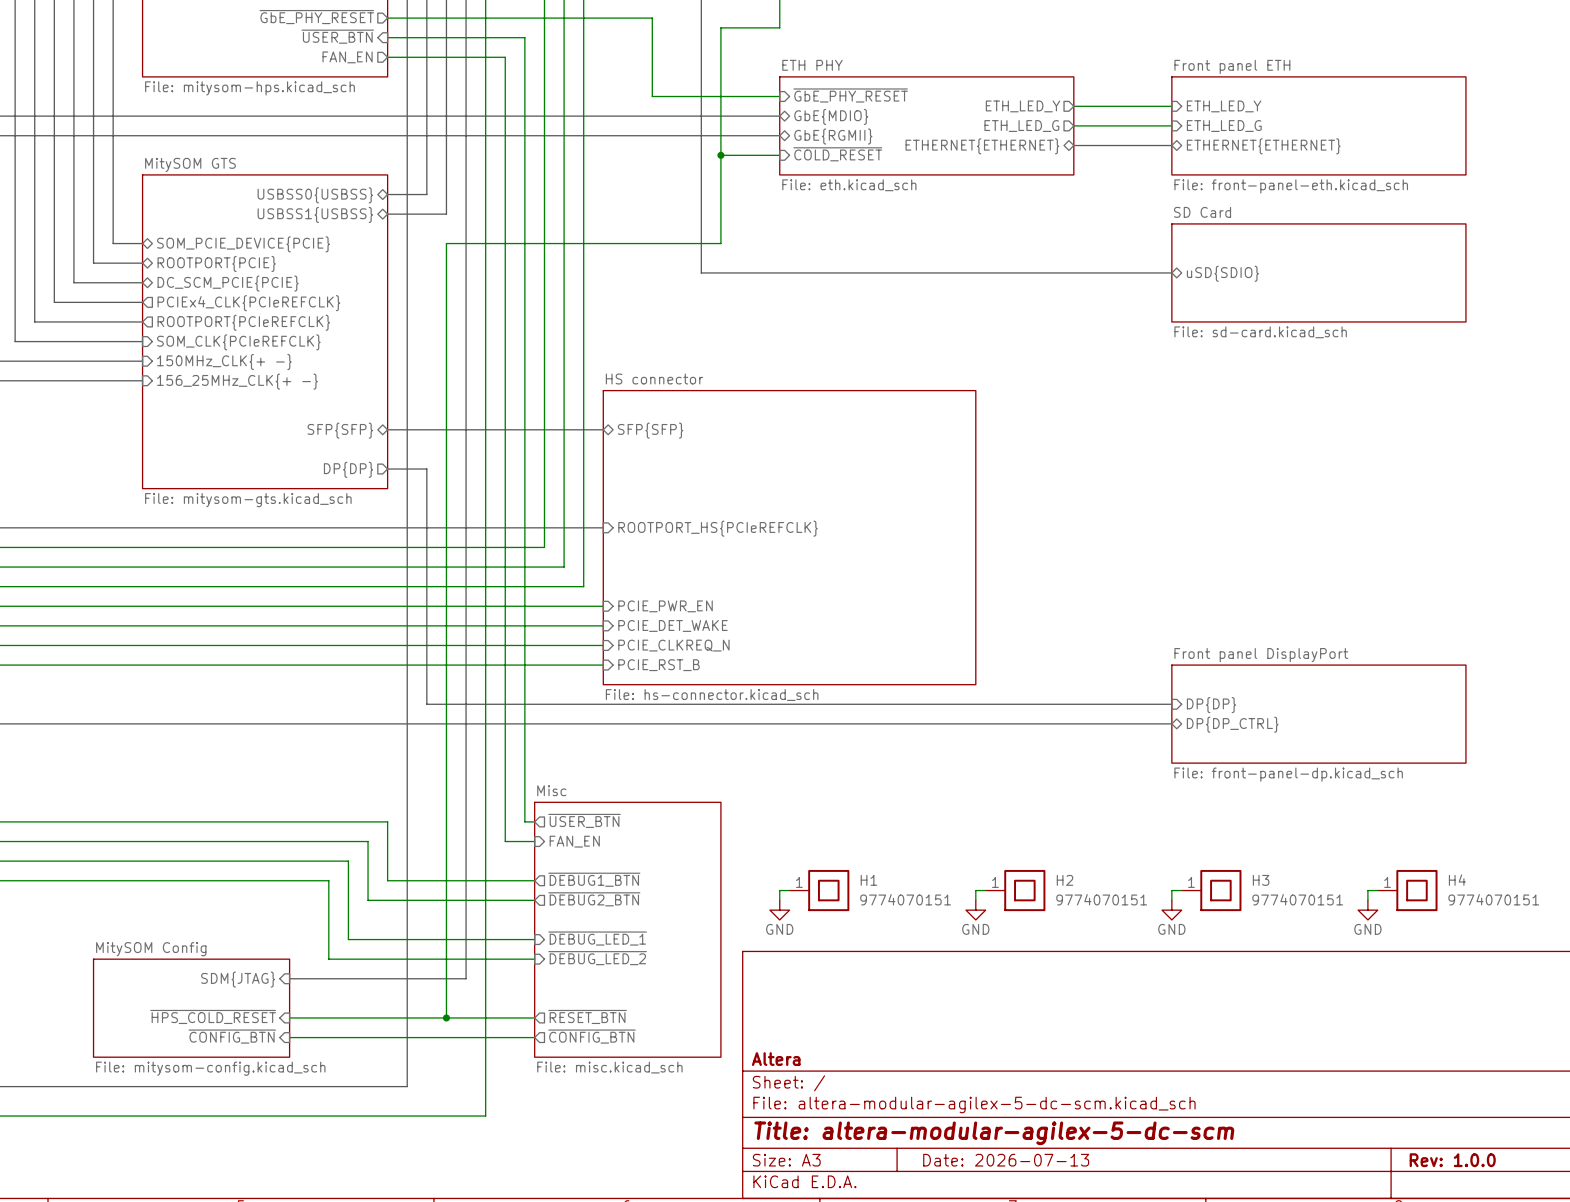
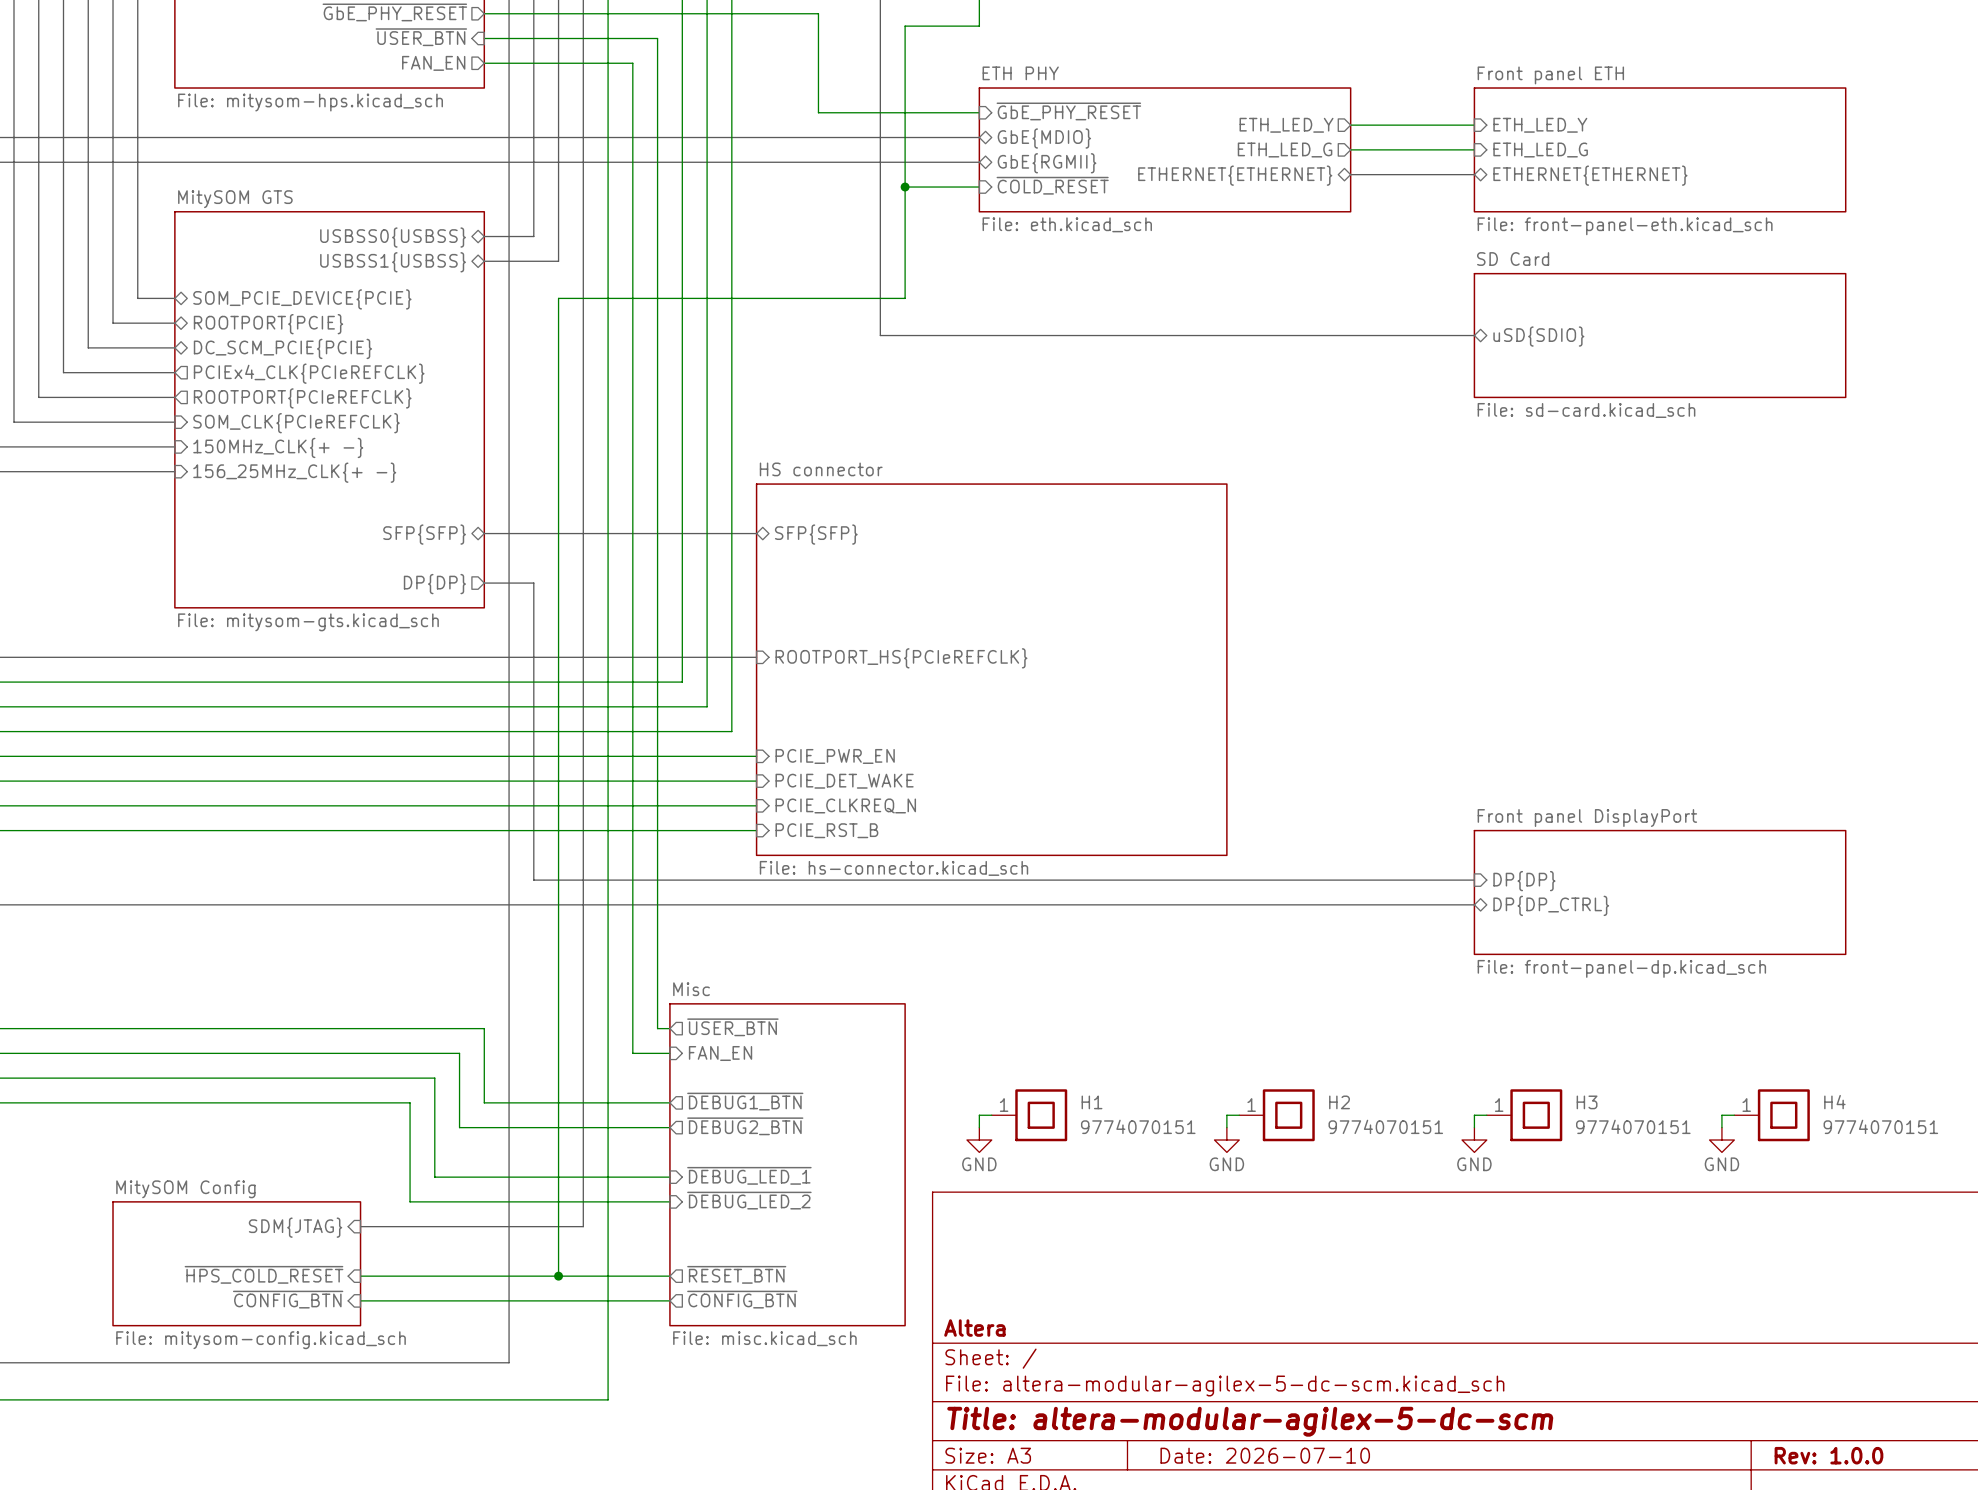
title block: Date: 2026-07-13 (1006, 1160) -> Date: 2026-07-10 (1265, 1455)

